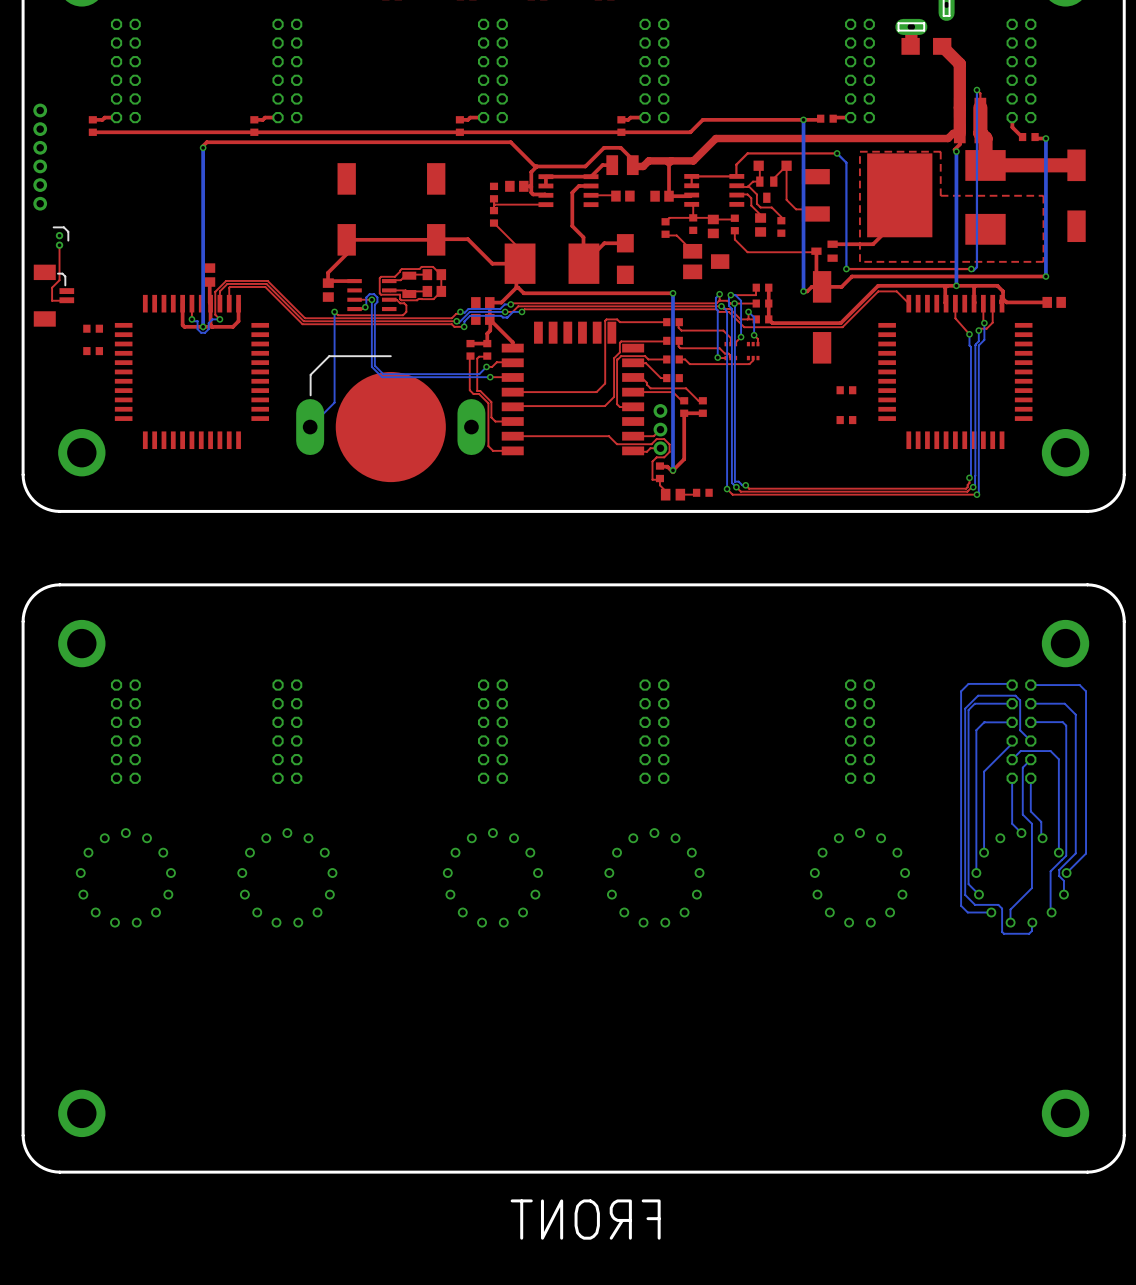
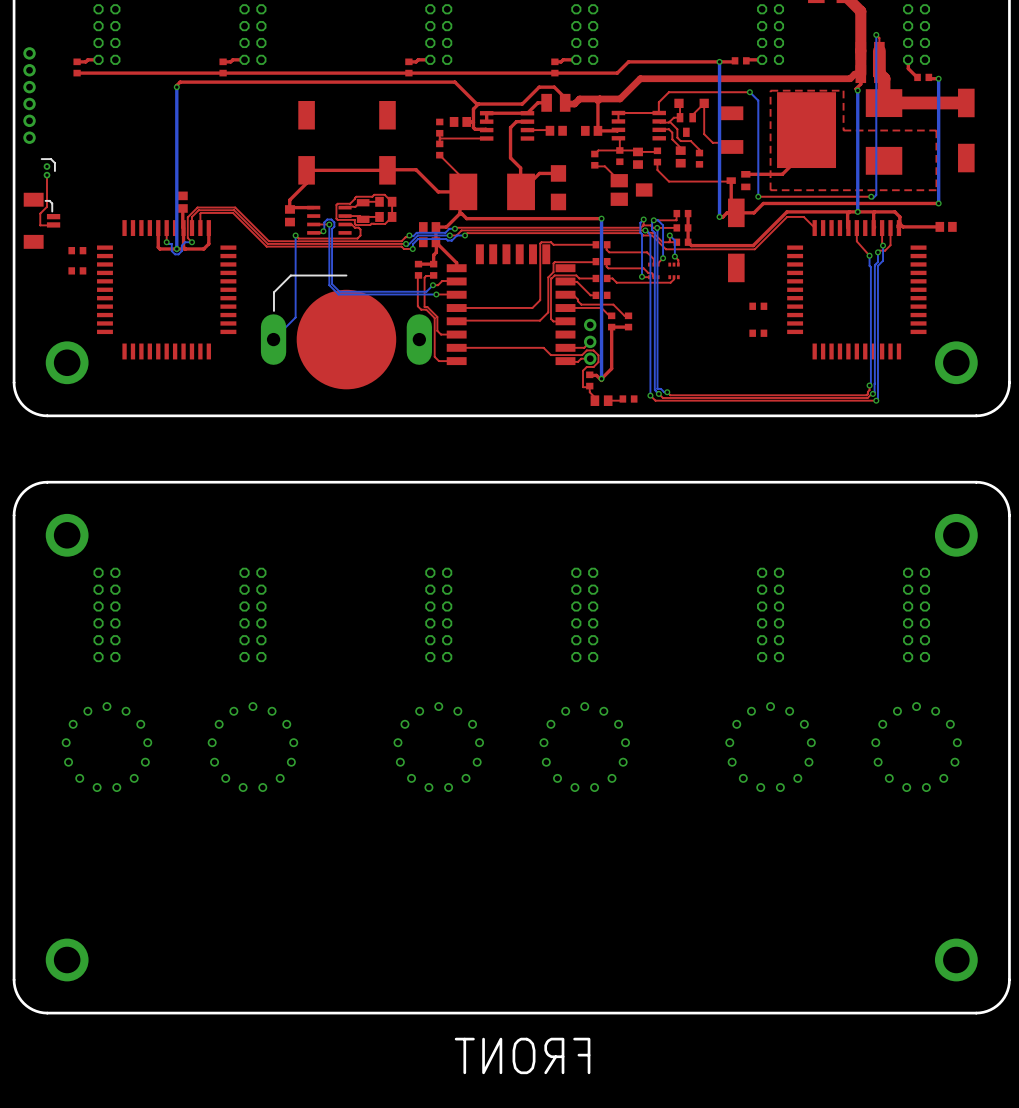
bottom track: (1012, 685) (968, 683) (961, 691) (961, 905) (967, 912) (991, 912) -> none
bottom track: (1030, 685) (1079, 685) (1086, 691) (1086, 853) (1066, 873) -> none
bottom track: (1012, 703) (974, 703) (968, 710) (968, 884) (978, 894) -> none
bottom track: (1030, 703) (1064, 703) (1075, 714) (1075, 853) (1059, 869) (1059, 876) (1063, 880) (1063, 894) -> none
bottom track: (1012, 722) (984, 722) (976, 730) (976, 873) -> none
bottom track: (1030, 722) (1062, 722) (1066, 725) (1066, 855) (1061, 860) -> none
bottom track: (1012, 740) (1012, 743) (984, 771) (984, 852) -> none
bottom track: (1030, 740) (1020, 730) (1020, 700) (1015, 695) (978, 695) (965, 708) (965, 894) (975, 904) (998, 904) (1002, 908) (1002, 931) (1003, 933) (1029, 933) (1031, 930) (1032, 922) -> none
bottom track: (1012, 759) (1020, 751) (1050, 751) (1058, 759) (1058, 852) -> none
bottom track: (1030, 759) (1022, 767) (1022, 814) (1031, 823) (1031, 888) (1010, 909) (1010, 922) -> none
bottom track: (1012, 778) (1012, 823) (1021, 833) -> none
bottom track: (1030, 778) (1030, 811) (1041, 821) (1042, 838) -> none
bottom track: (1061, 860) (1050, 871) (1051, 912) -> none

